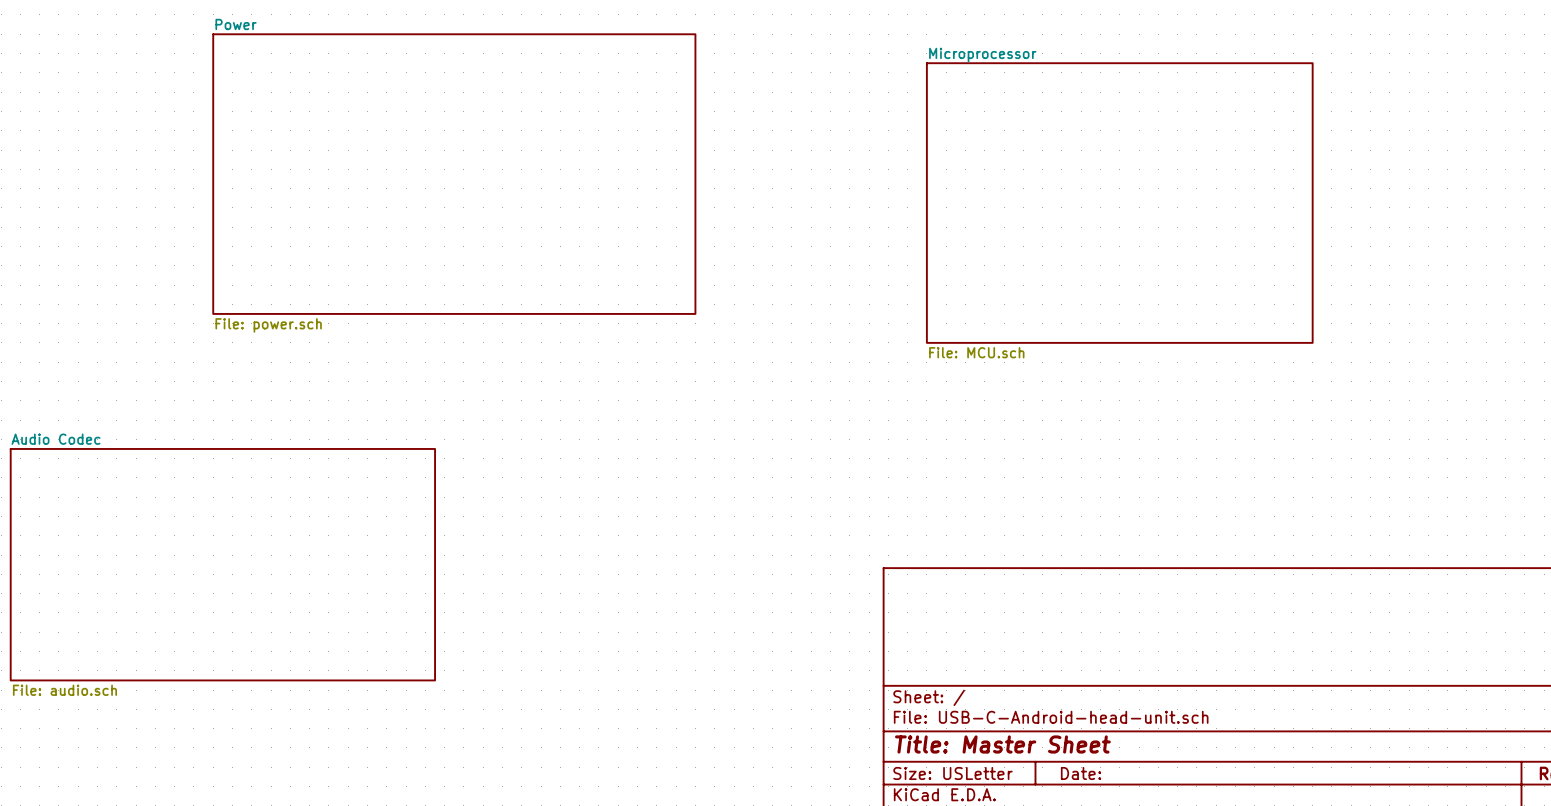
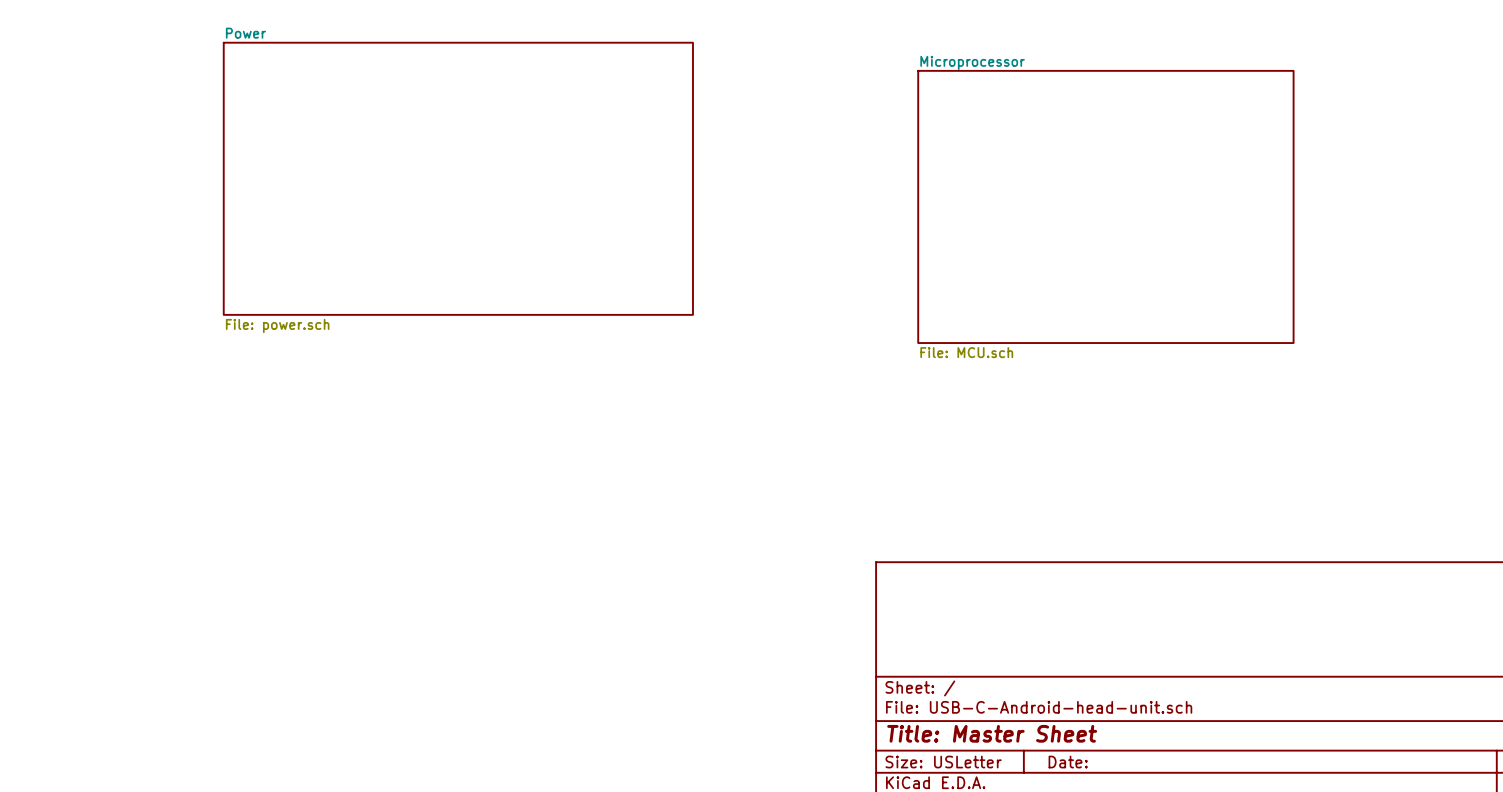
sheet Audio Codec: File: audio.sch (222, 564) -> none

